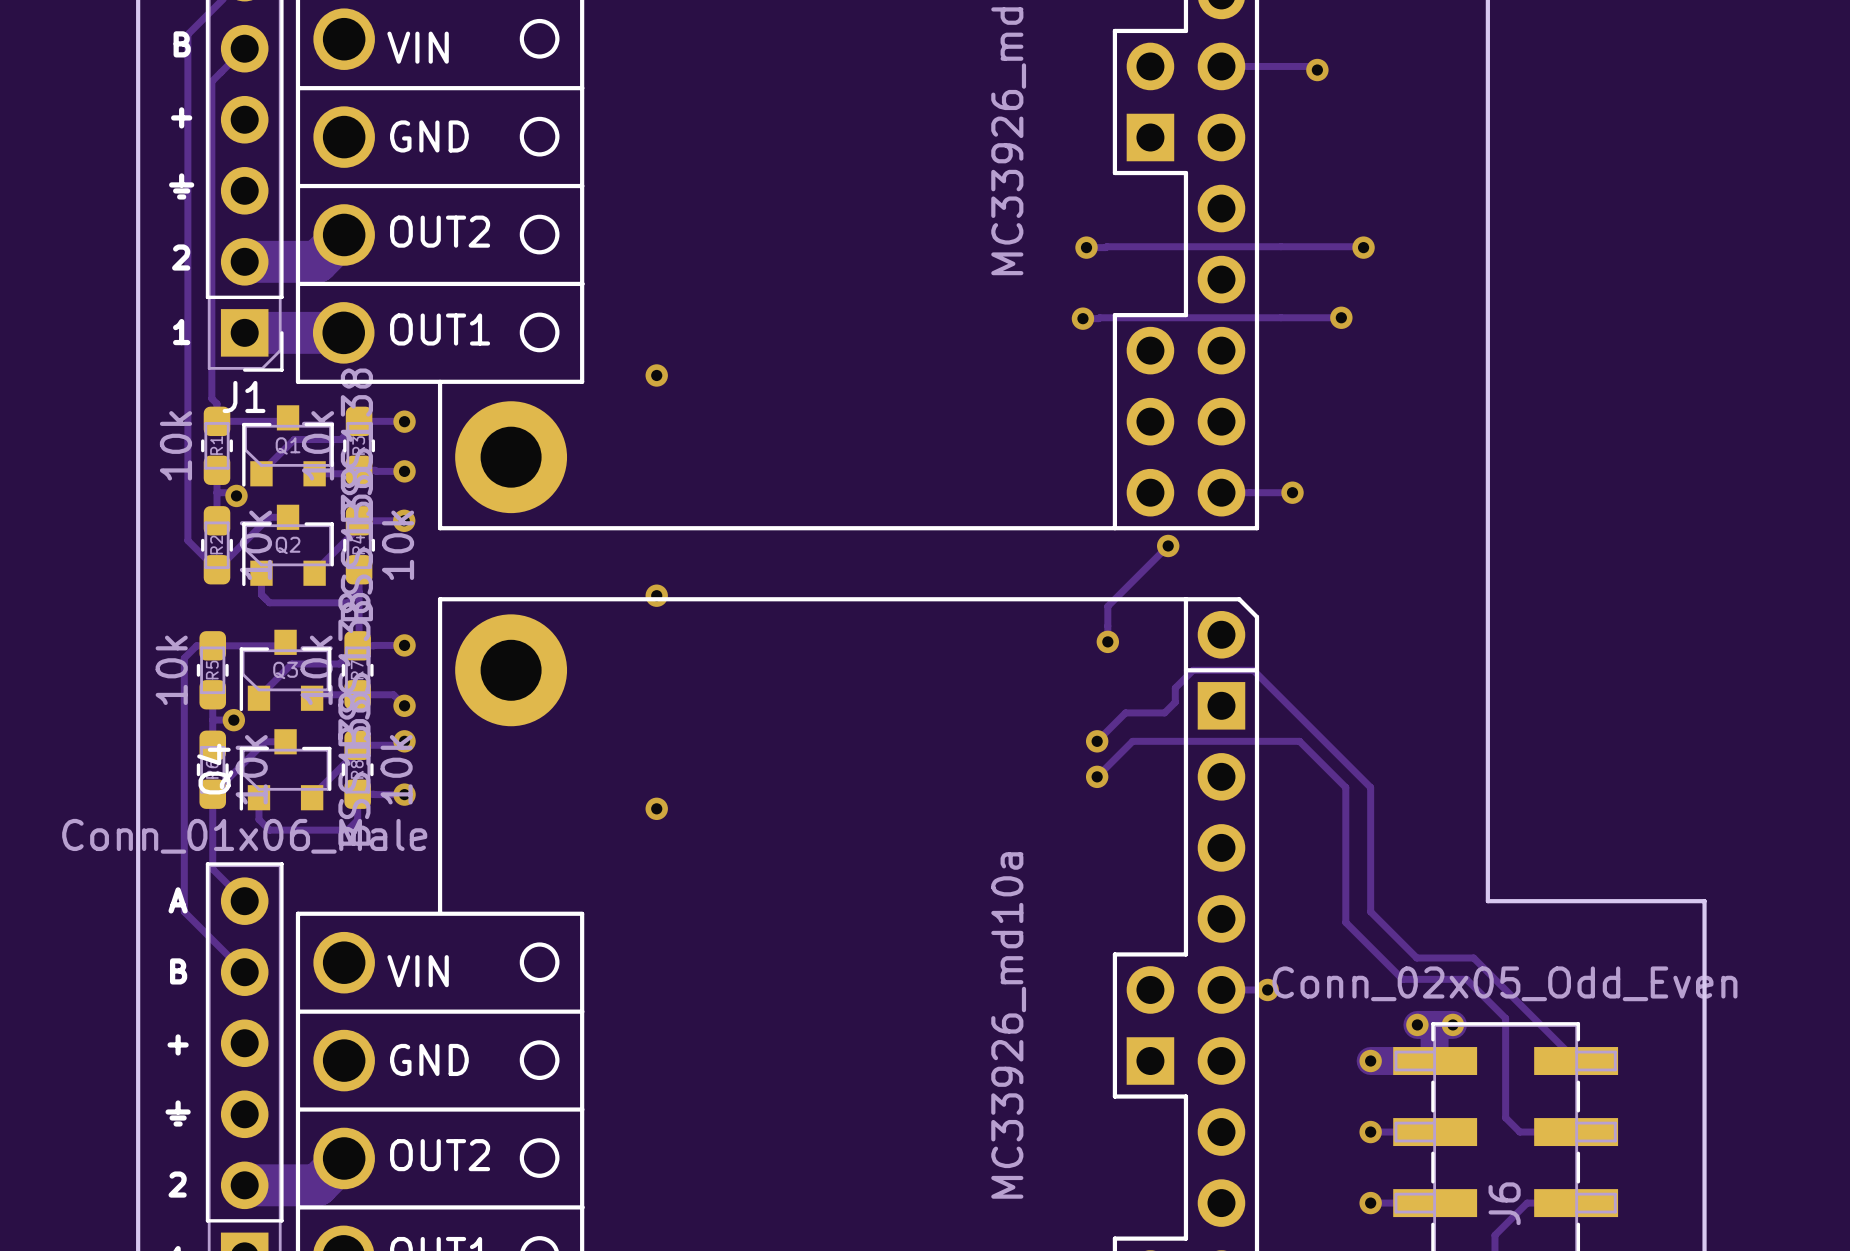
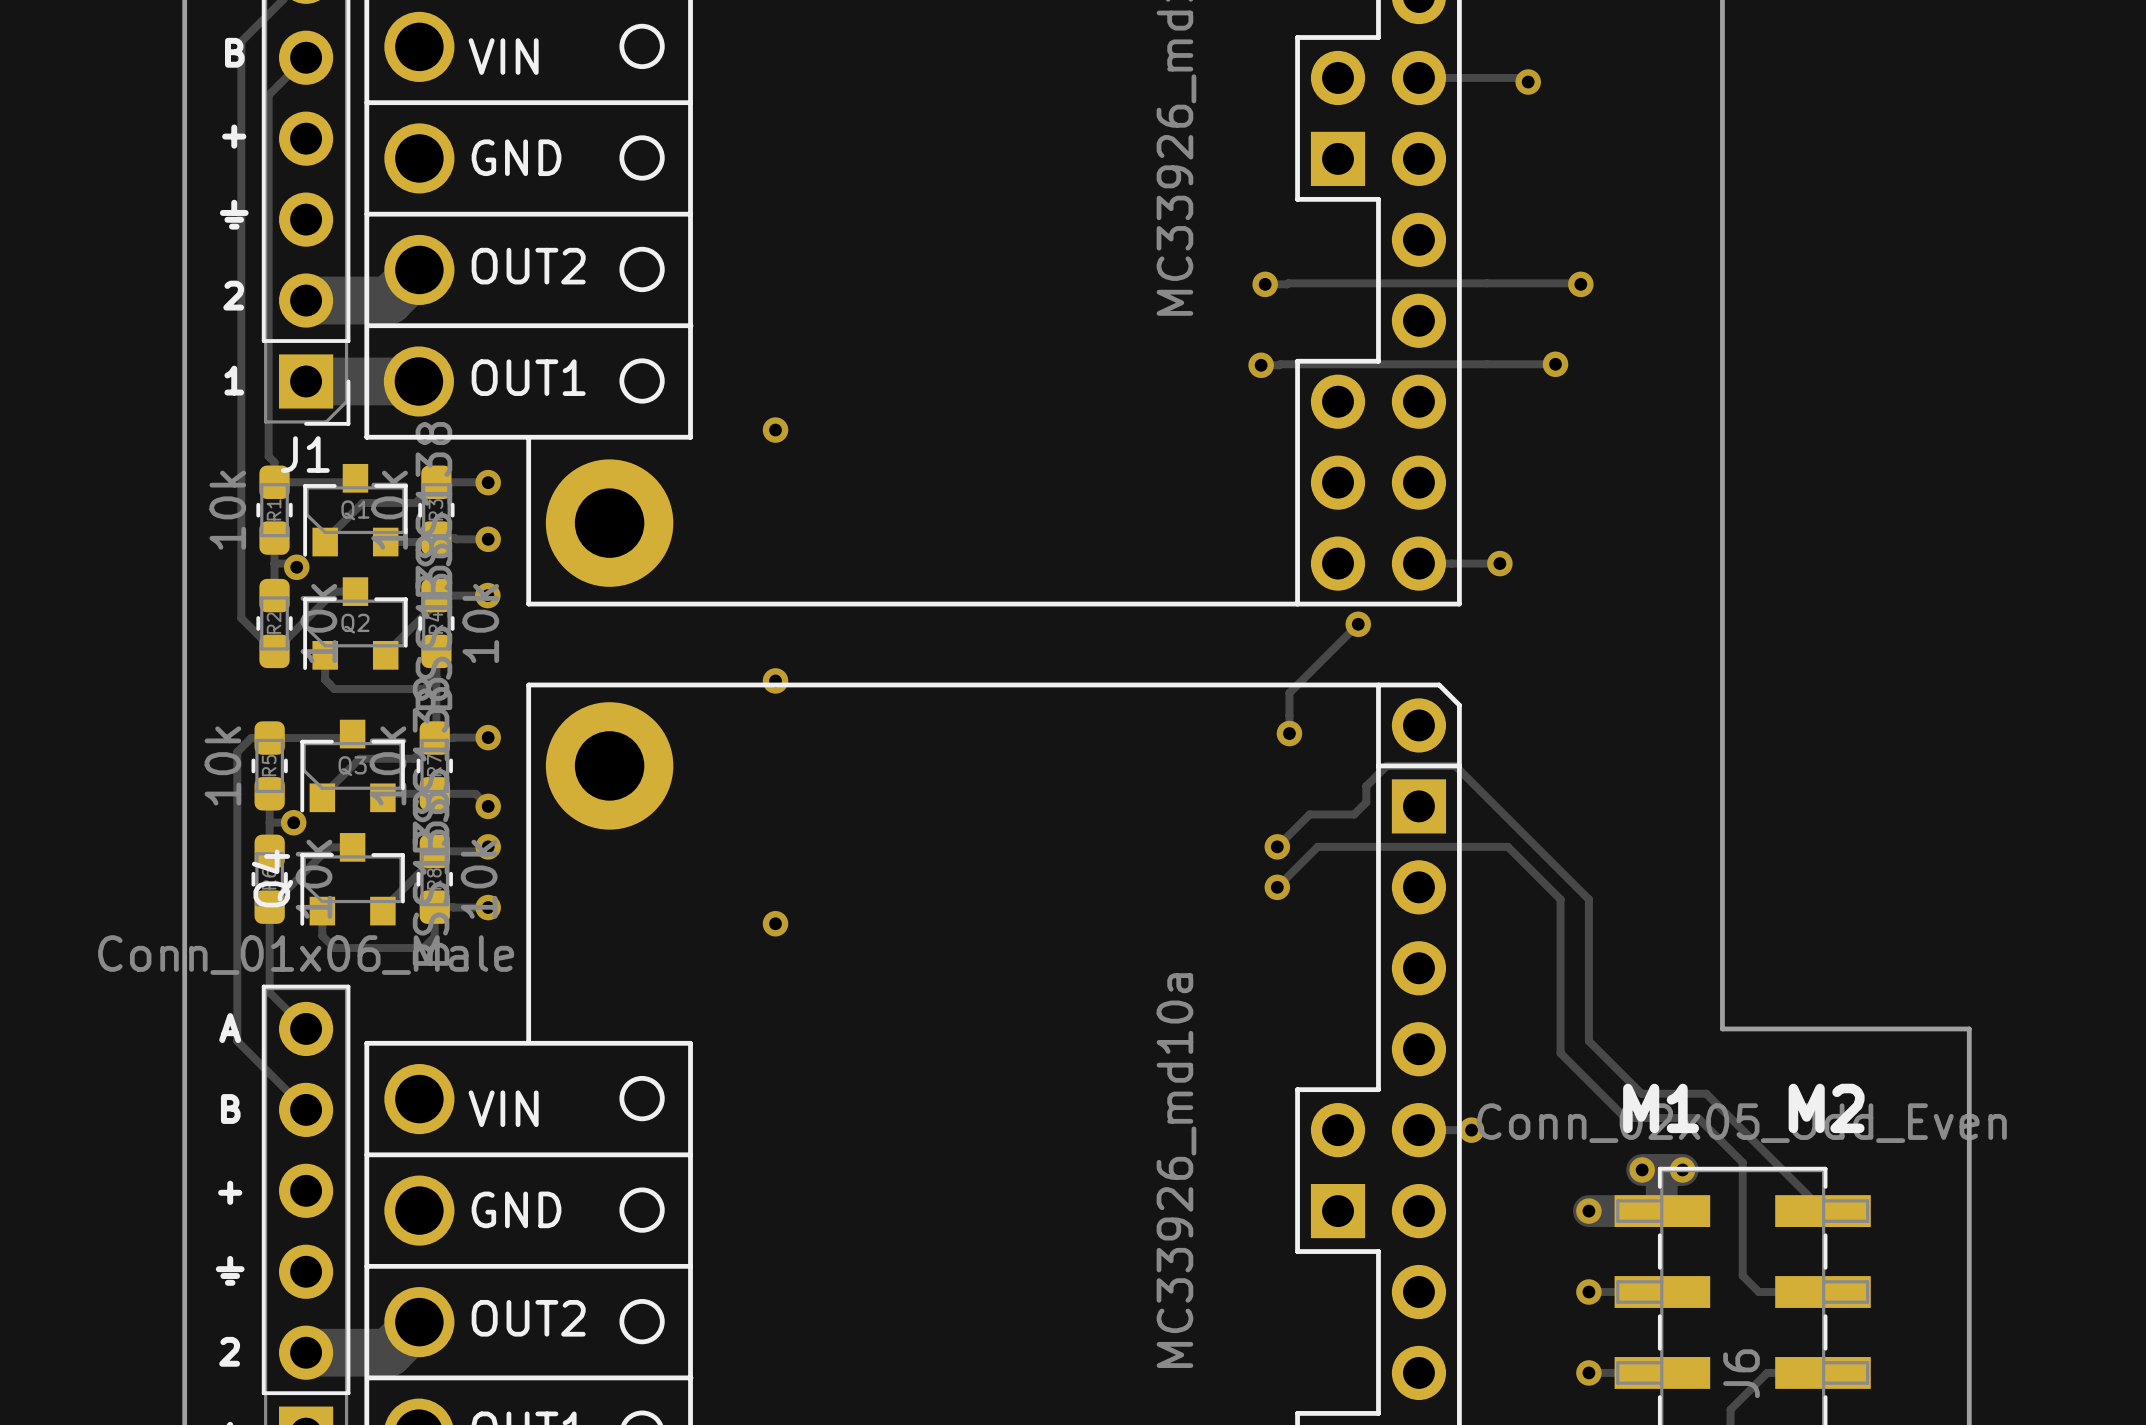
text: none -> M1 (1661, 1108)
text: none -> M2 (1826, 1108)

